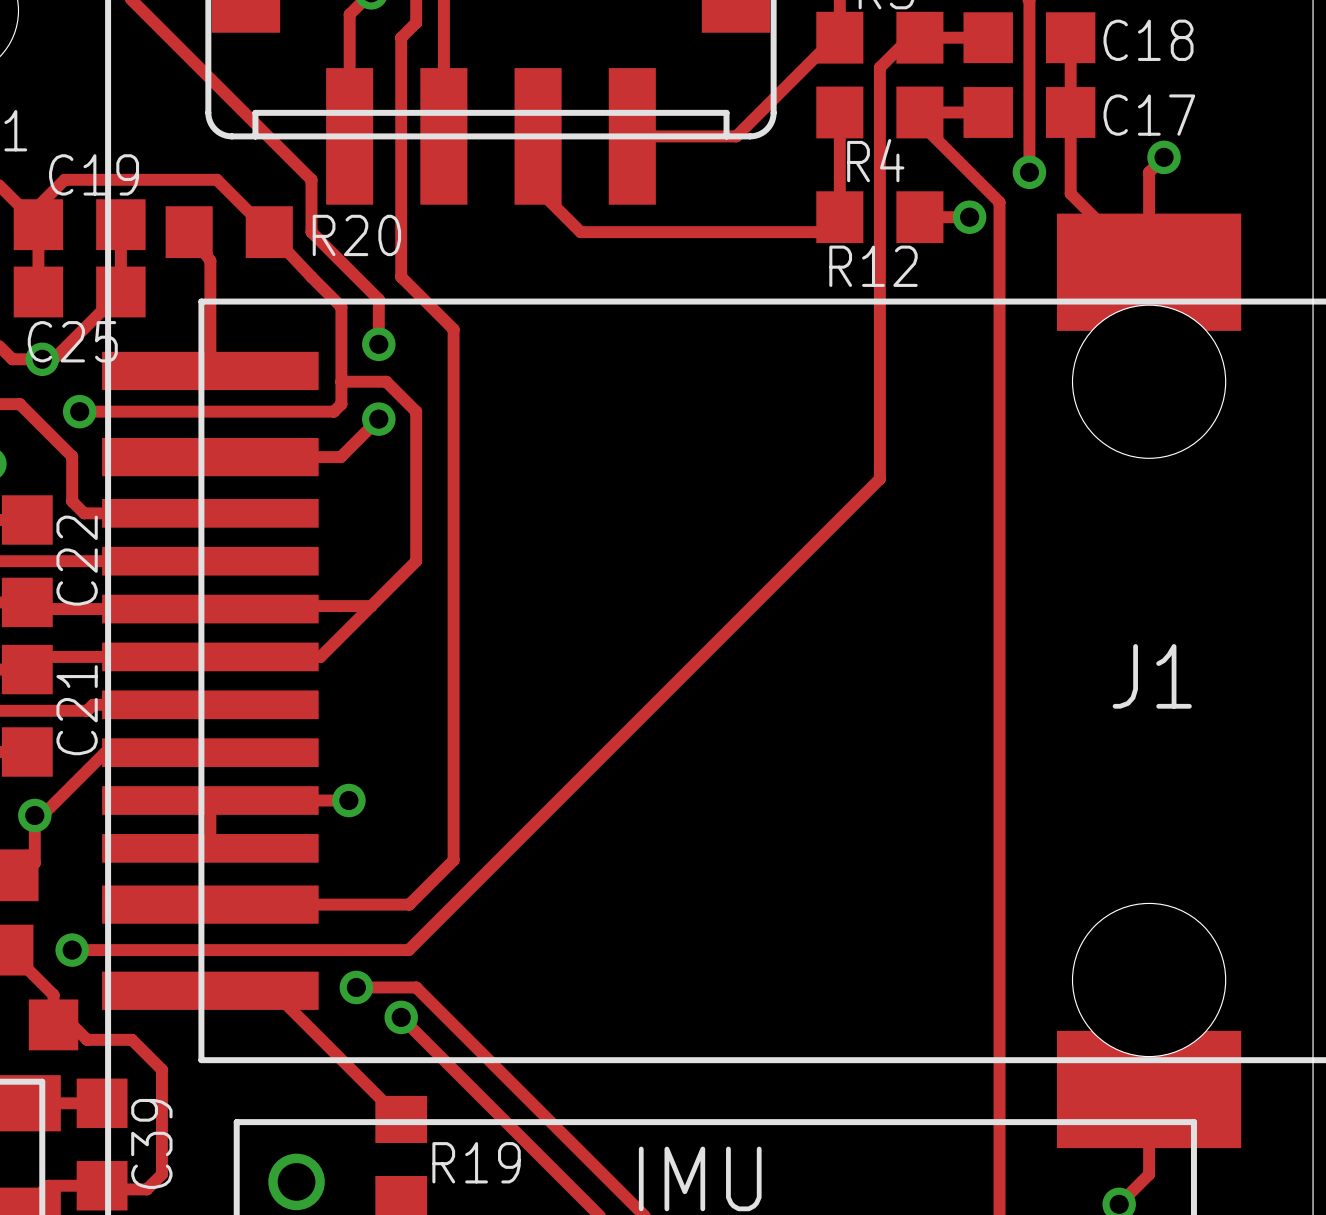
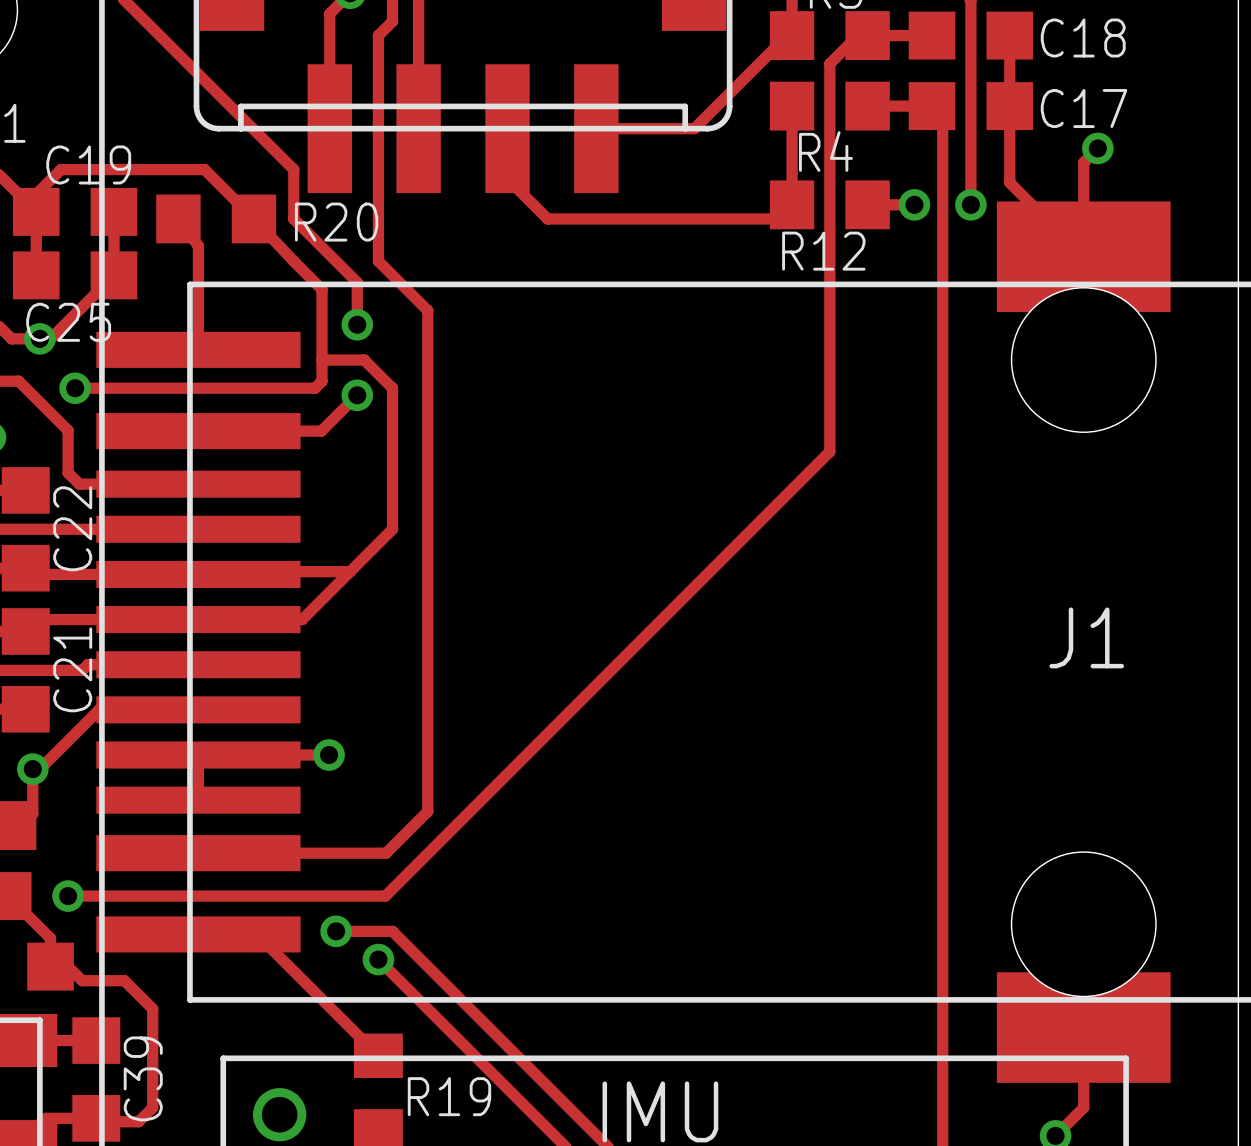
track: (919, 112) (927, 130) (999, 202) -> (932, 106) (942, 116) (942, 190)
track: none -> (970, 162) (970, 204)
via position: (1029, 172) -> (970, 204)

